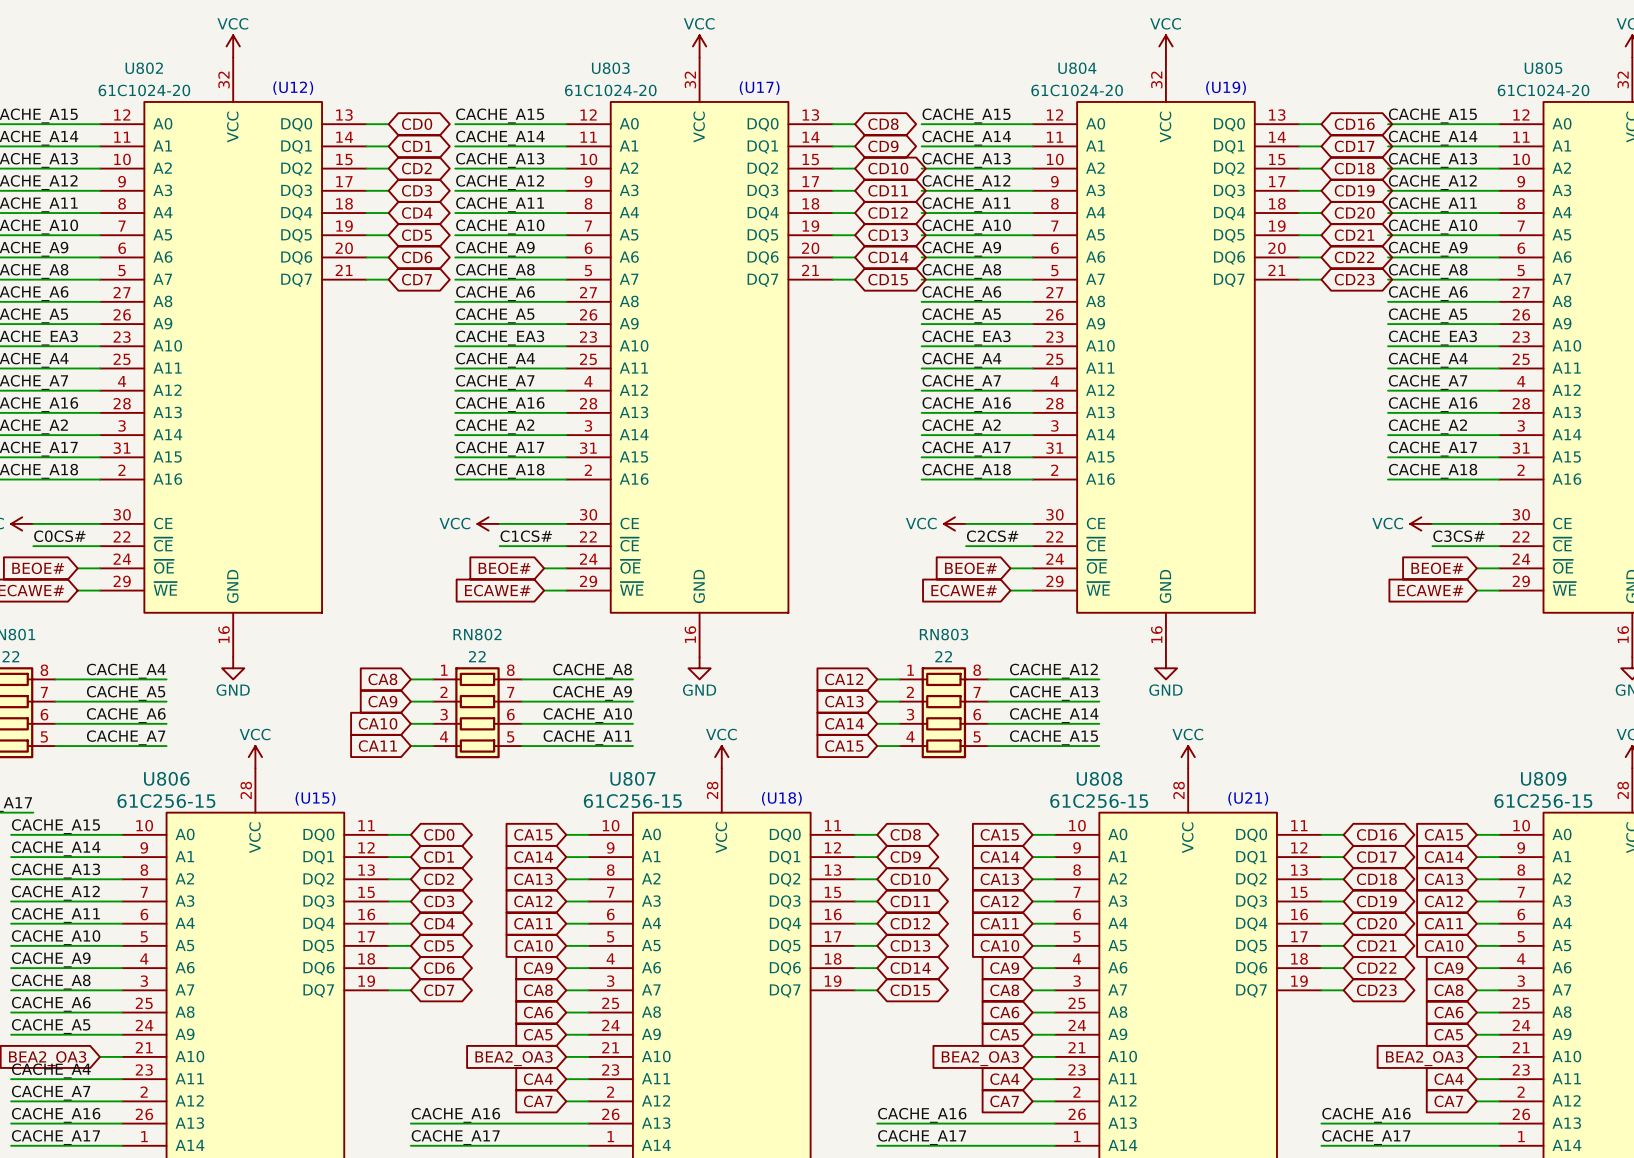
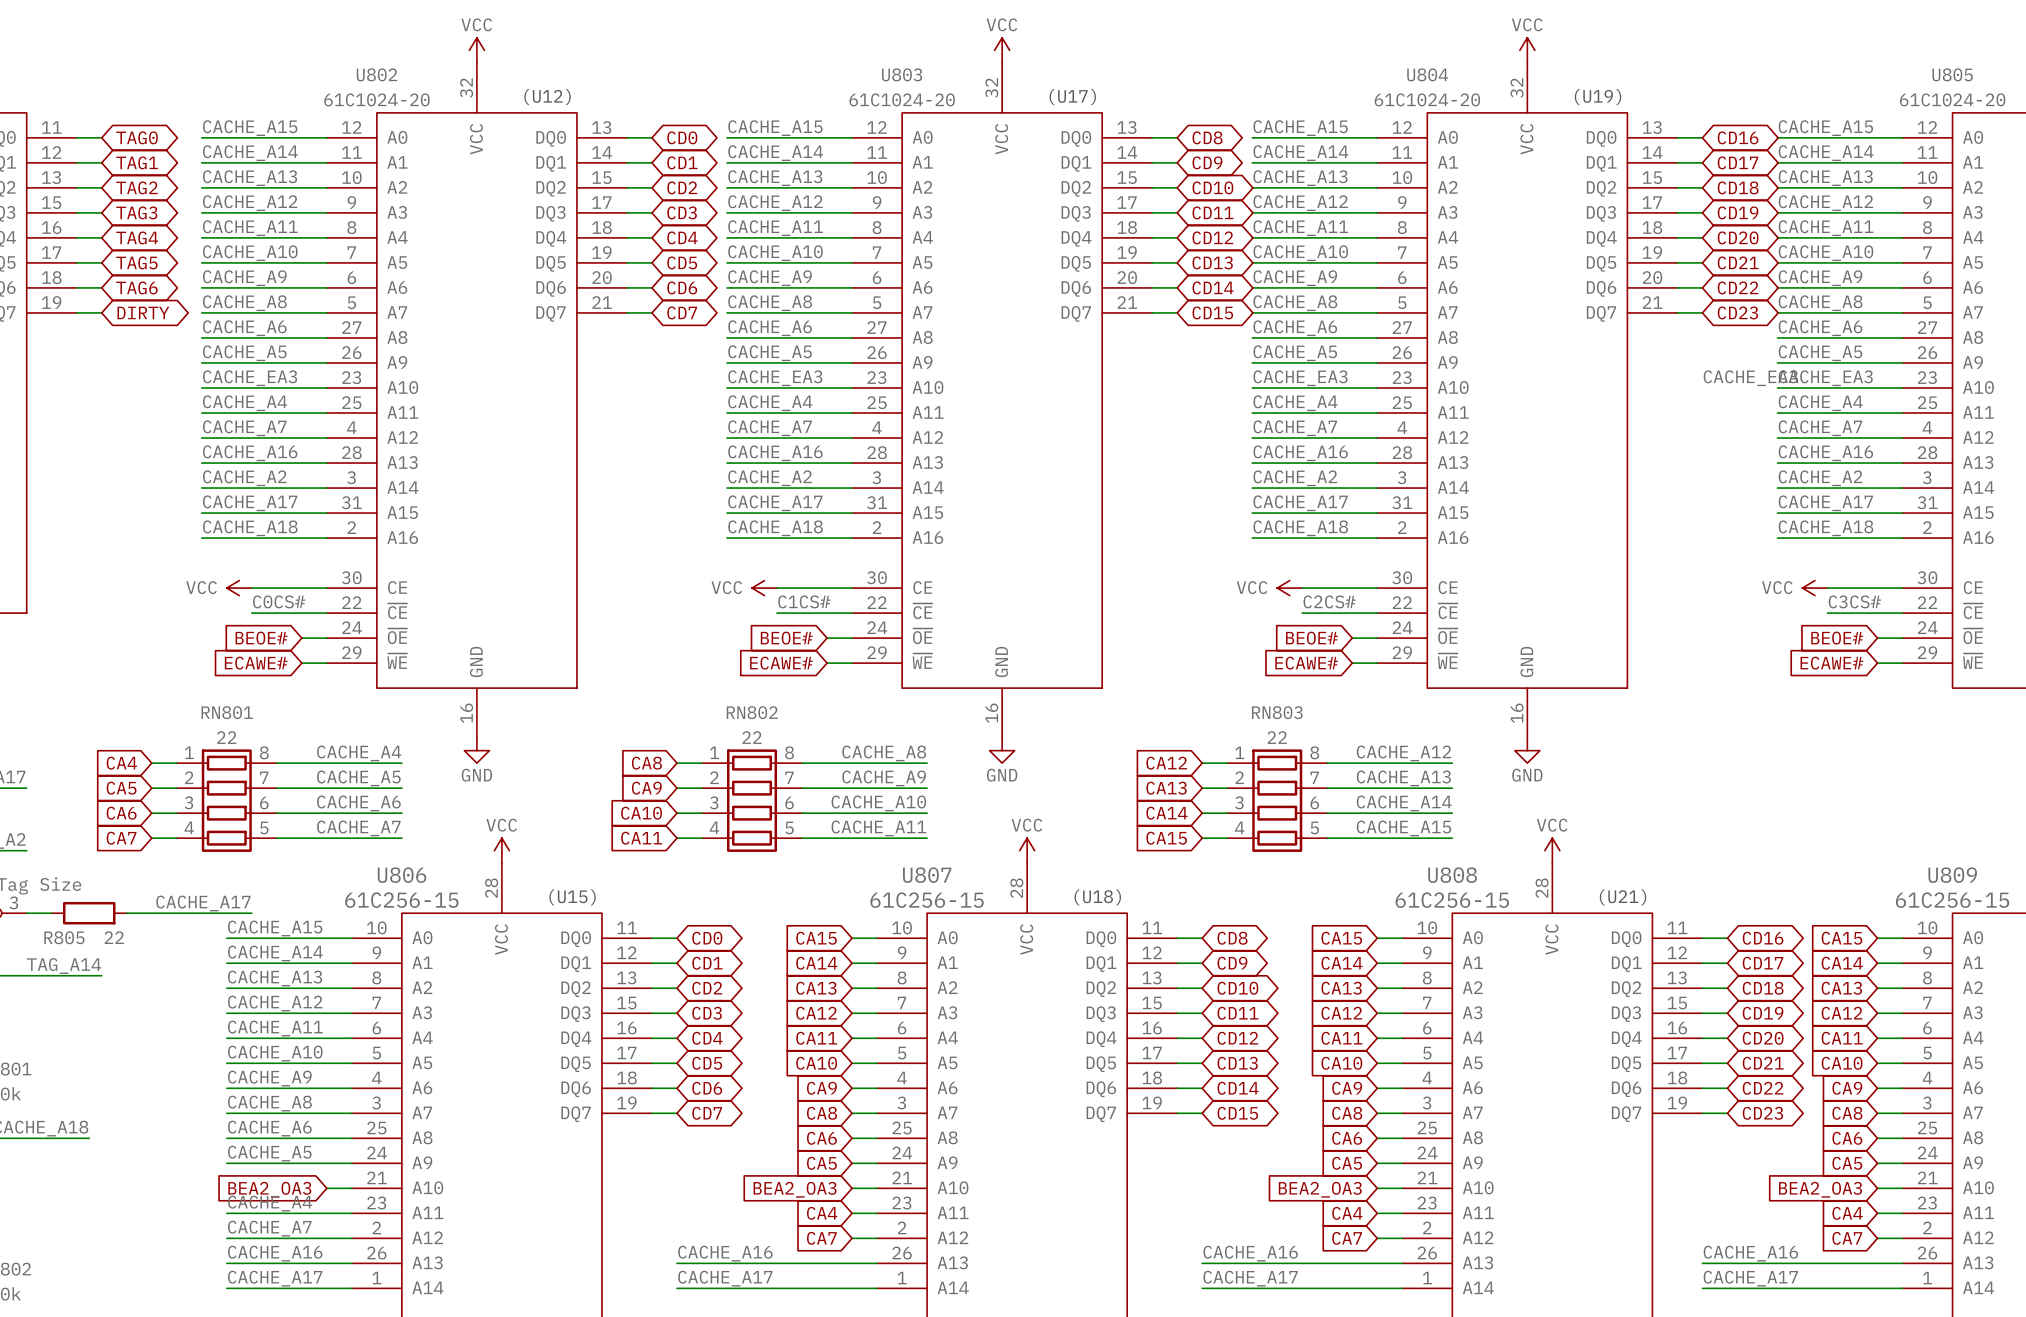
label: none -> CACHE_EA3 (1750, 378)

